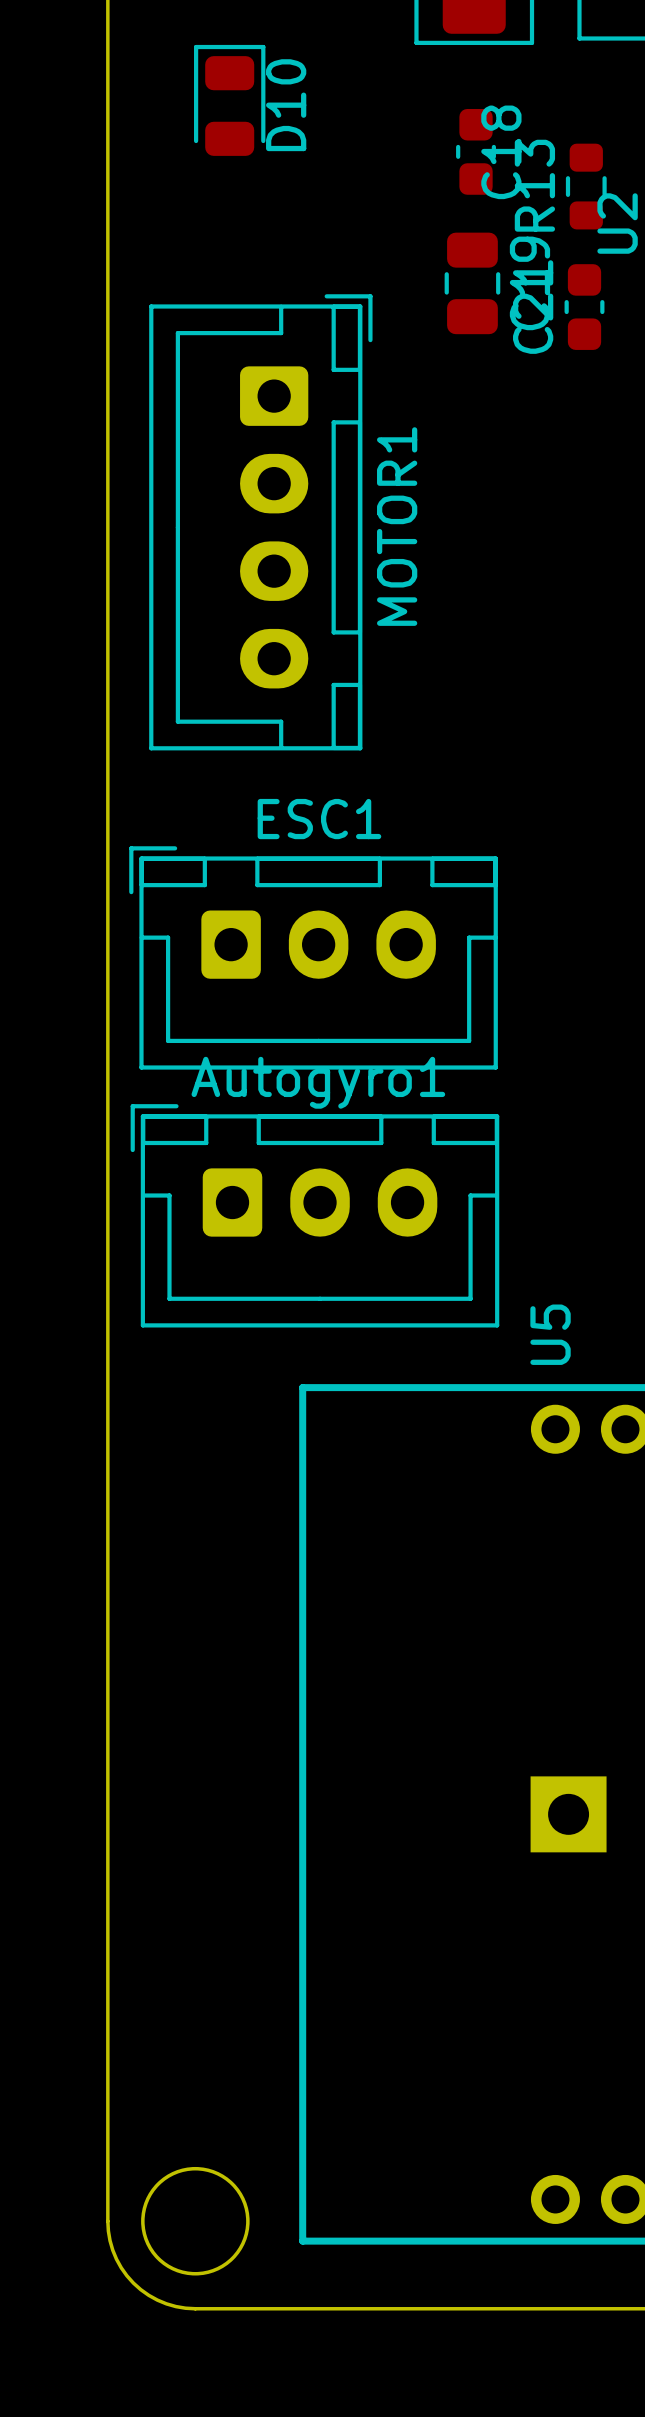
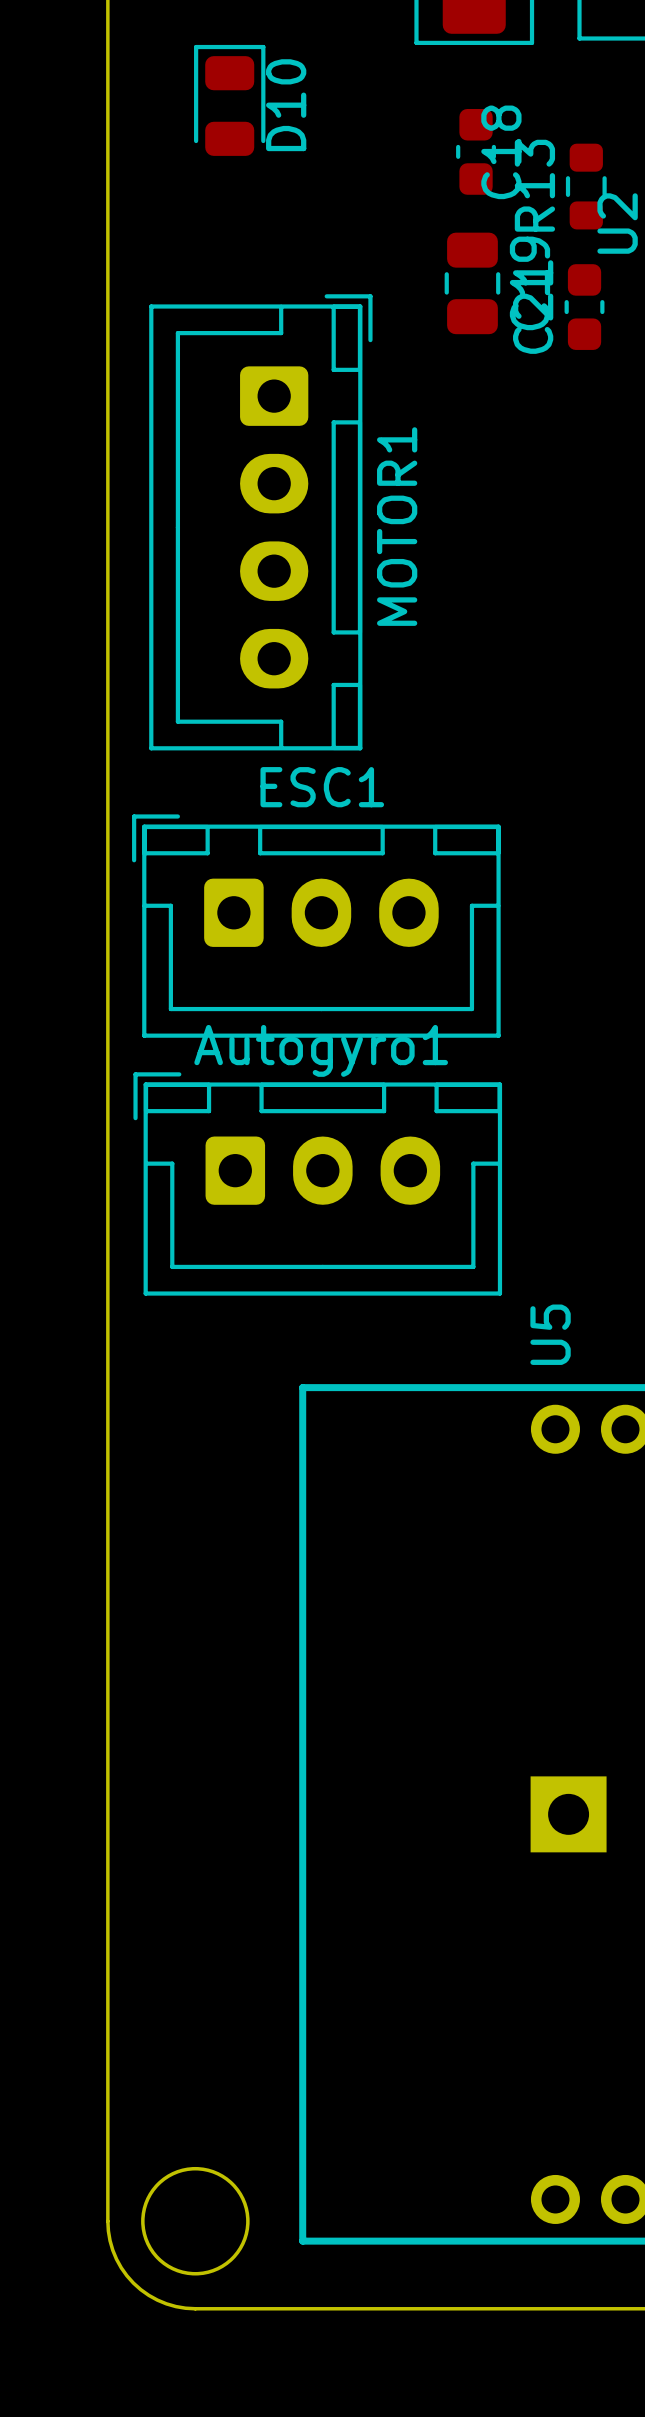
ESC1 position: (313, 957) -> (316, 926)
Autogyro1 position: (314, 1215) -> (317, 1183)

